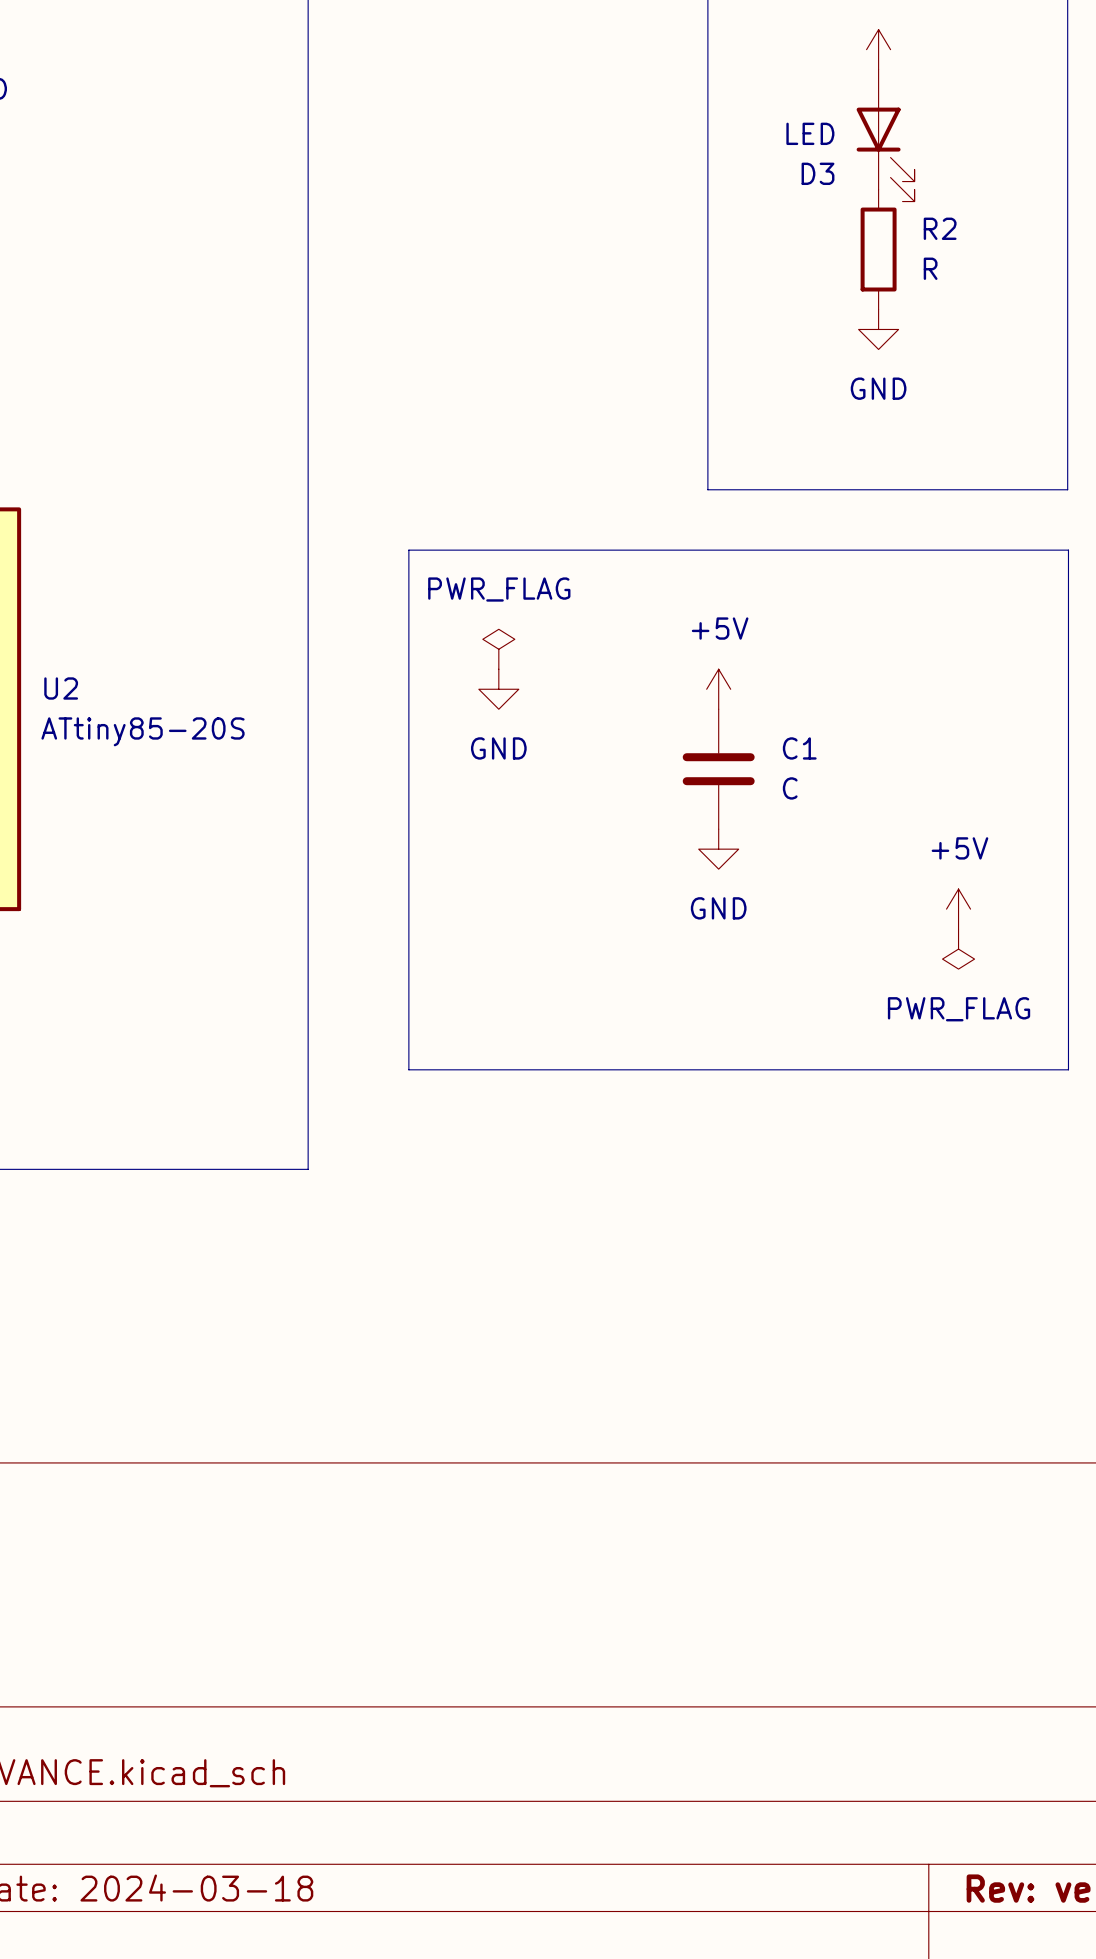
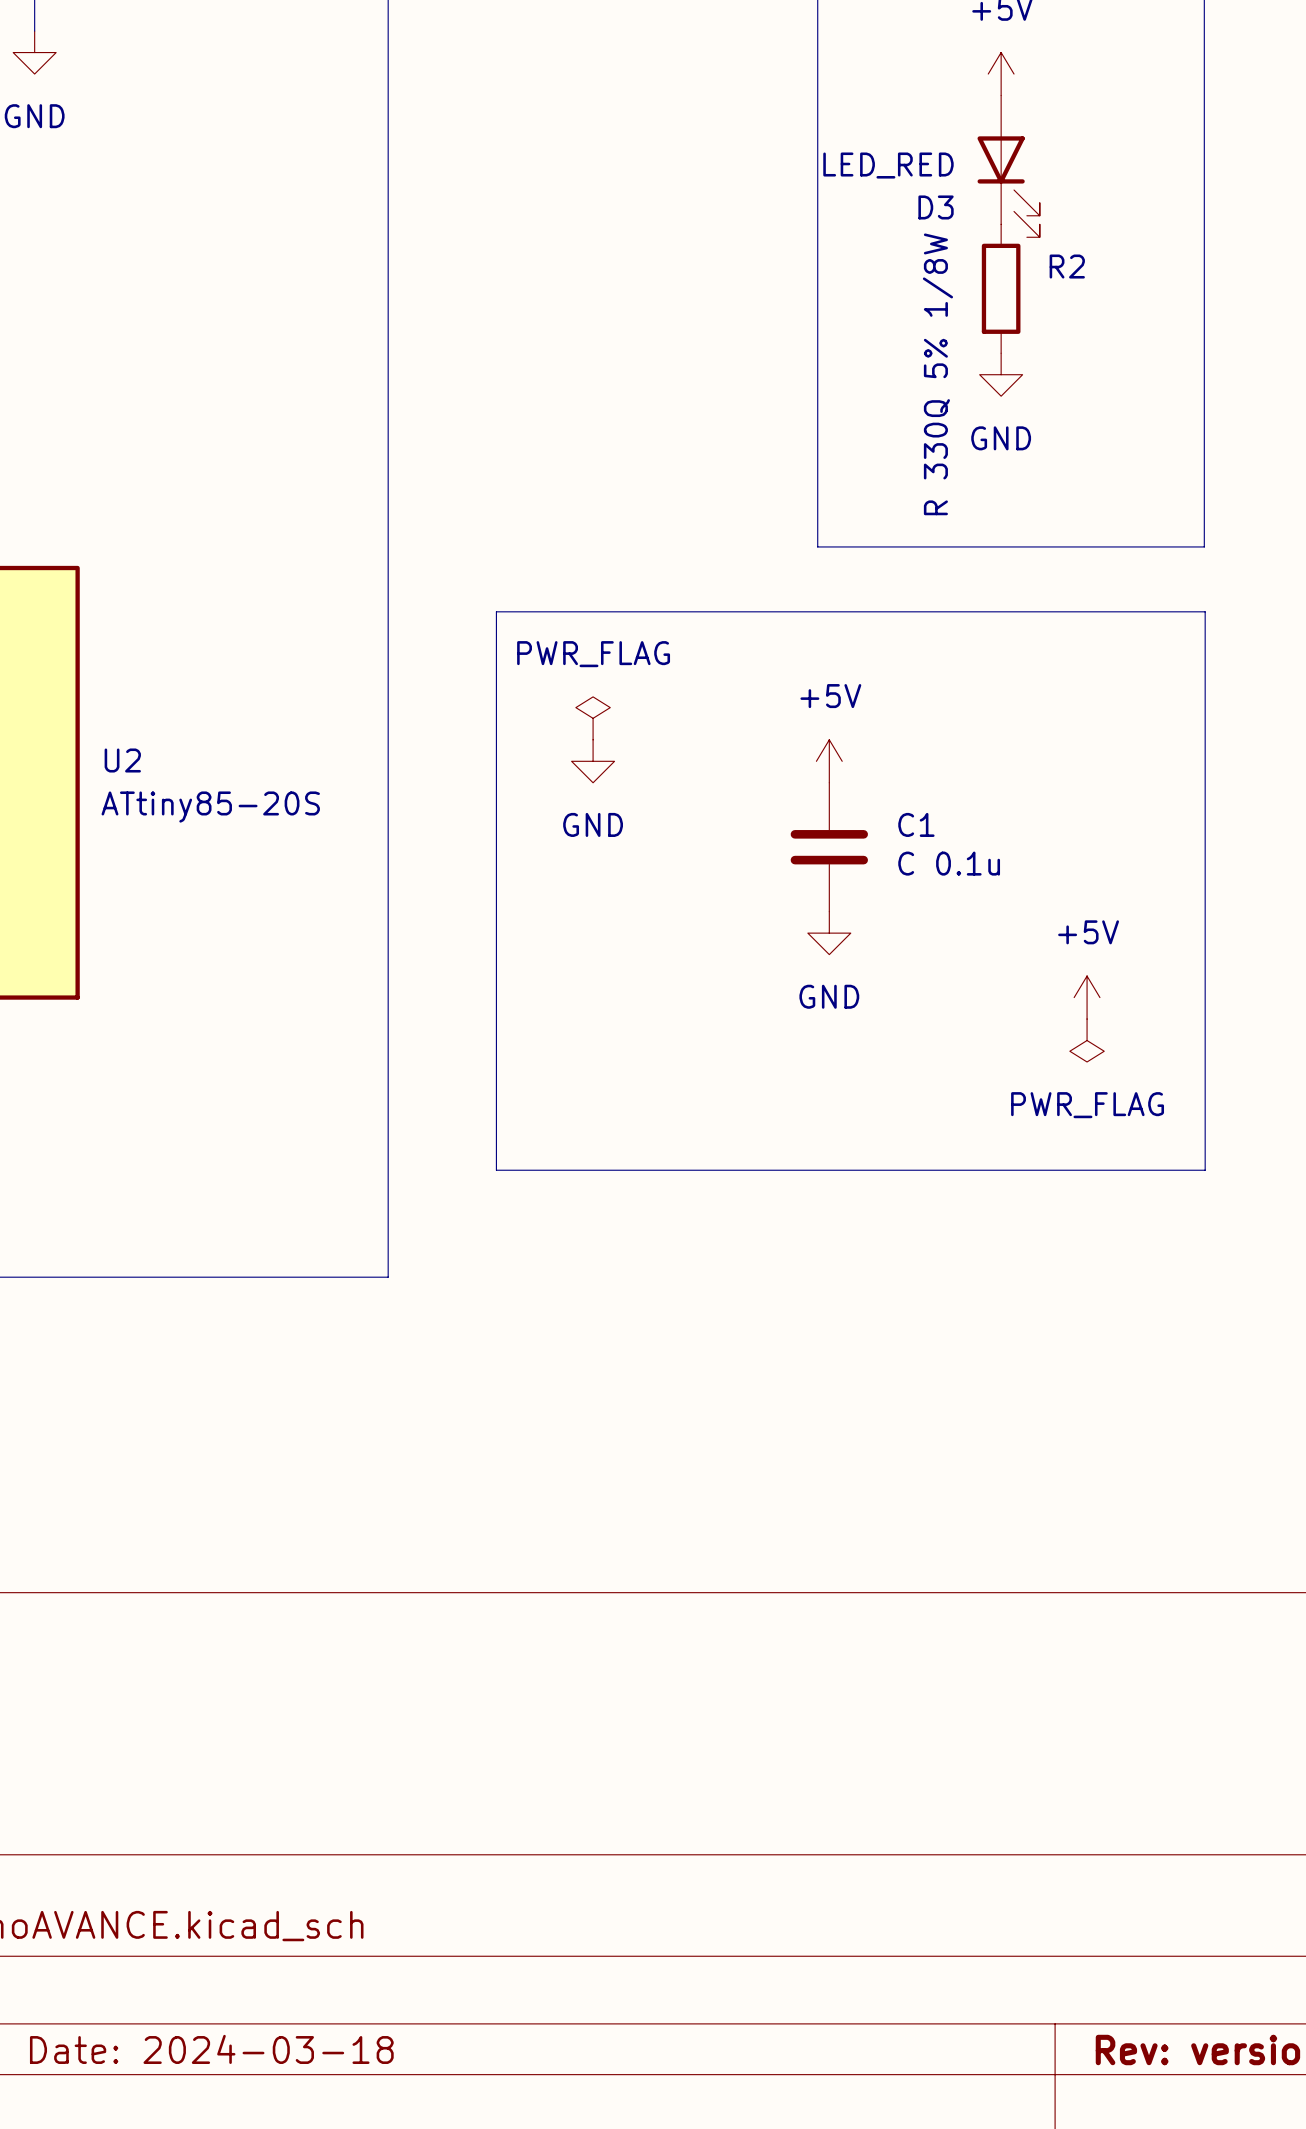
D3 value: LED (810, 133) -> LED_RED (888, 165)
R2 value: R (930, 268) -> R 330Q 5% 1/8W (937, 374)
C1 value: C (790, 788) -> C 0.1u (949, 863)

